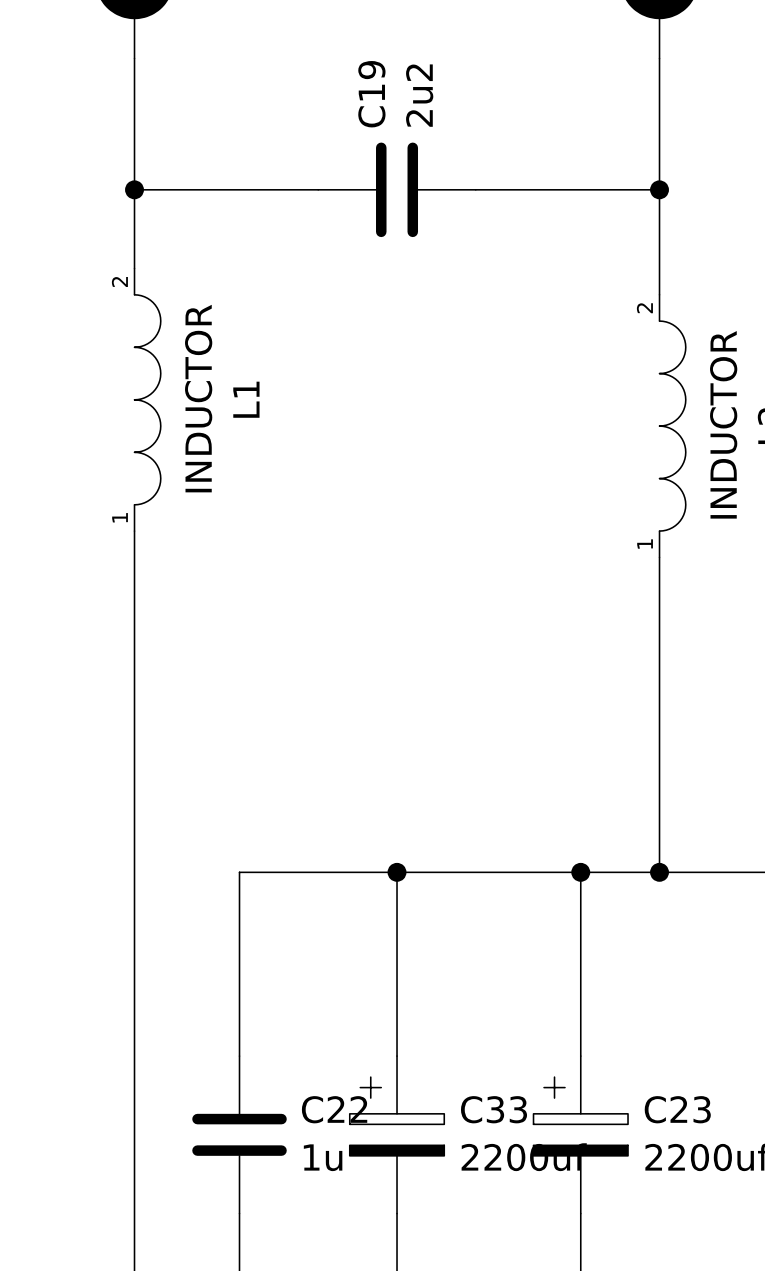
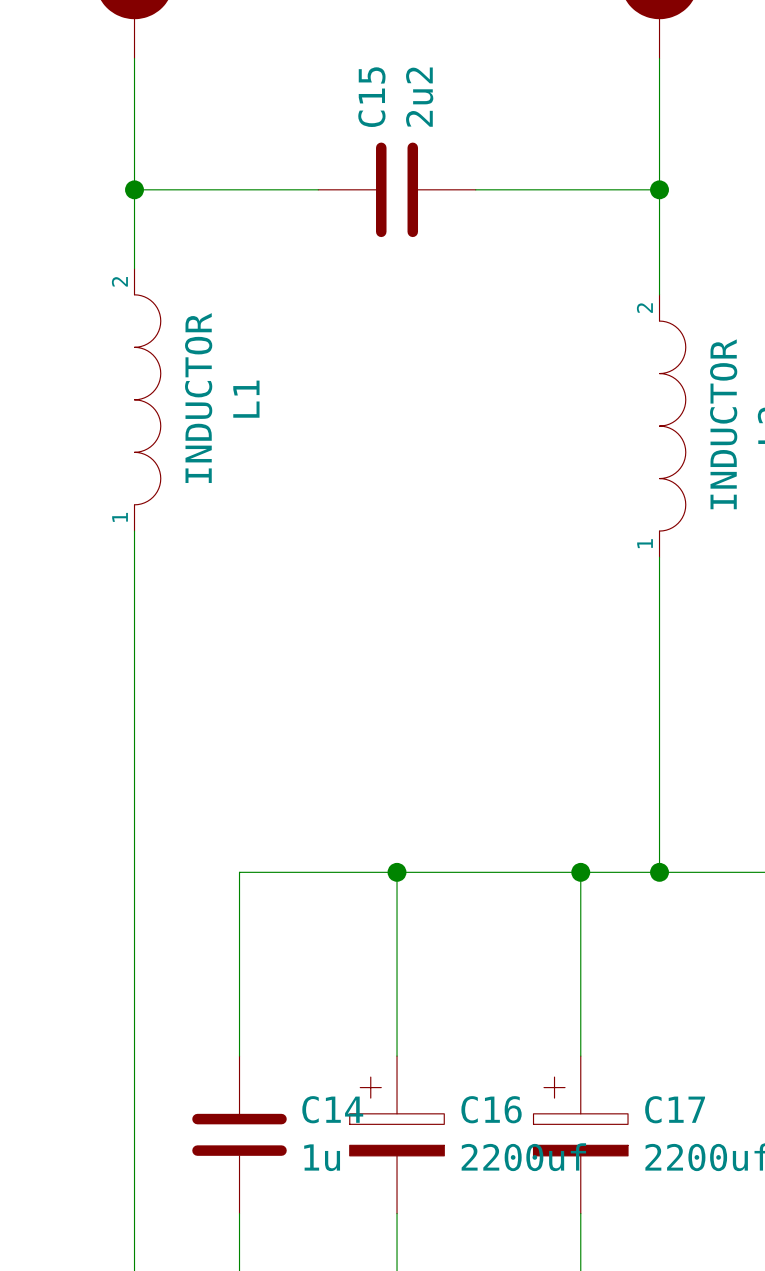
C19 name: C19 (371, 94) -> C15 (371, 97)
C22 name: C22 (334, 1109) -> C14 (332, 1109)
C33 name: C33 (494, 1109) -> C16 (491, 1109)
C23 name: C23 (677, 1109) -> C17 (675, 1109)

